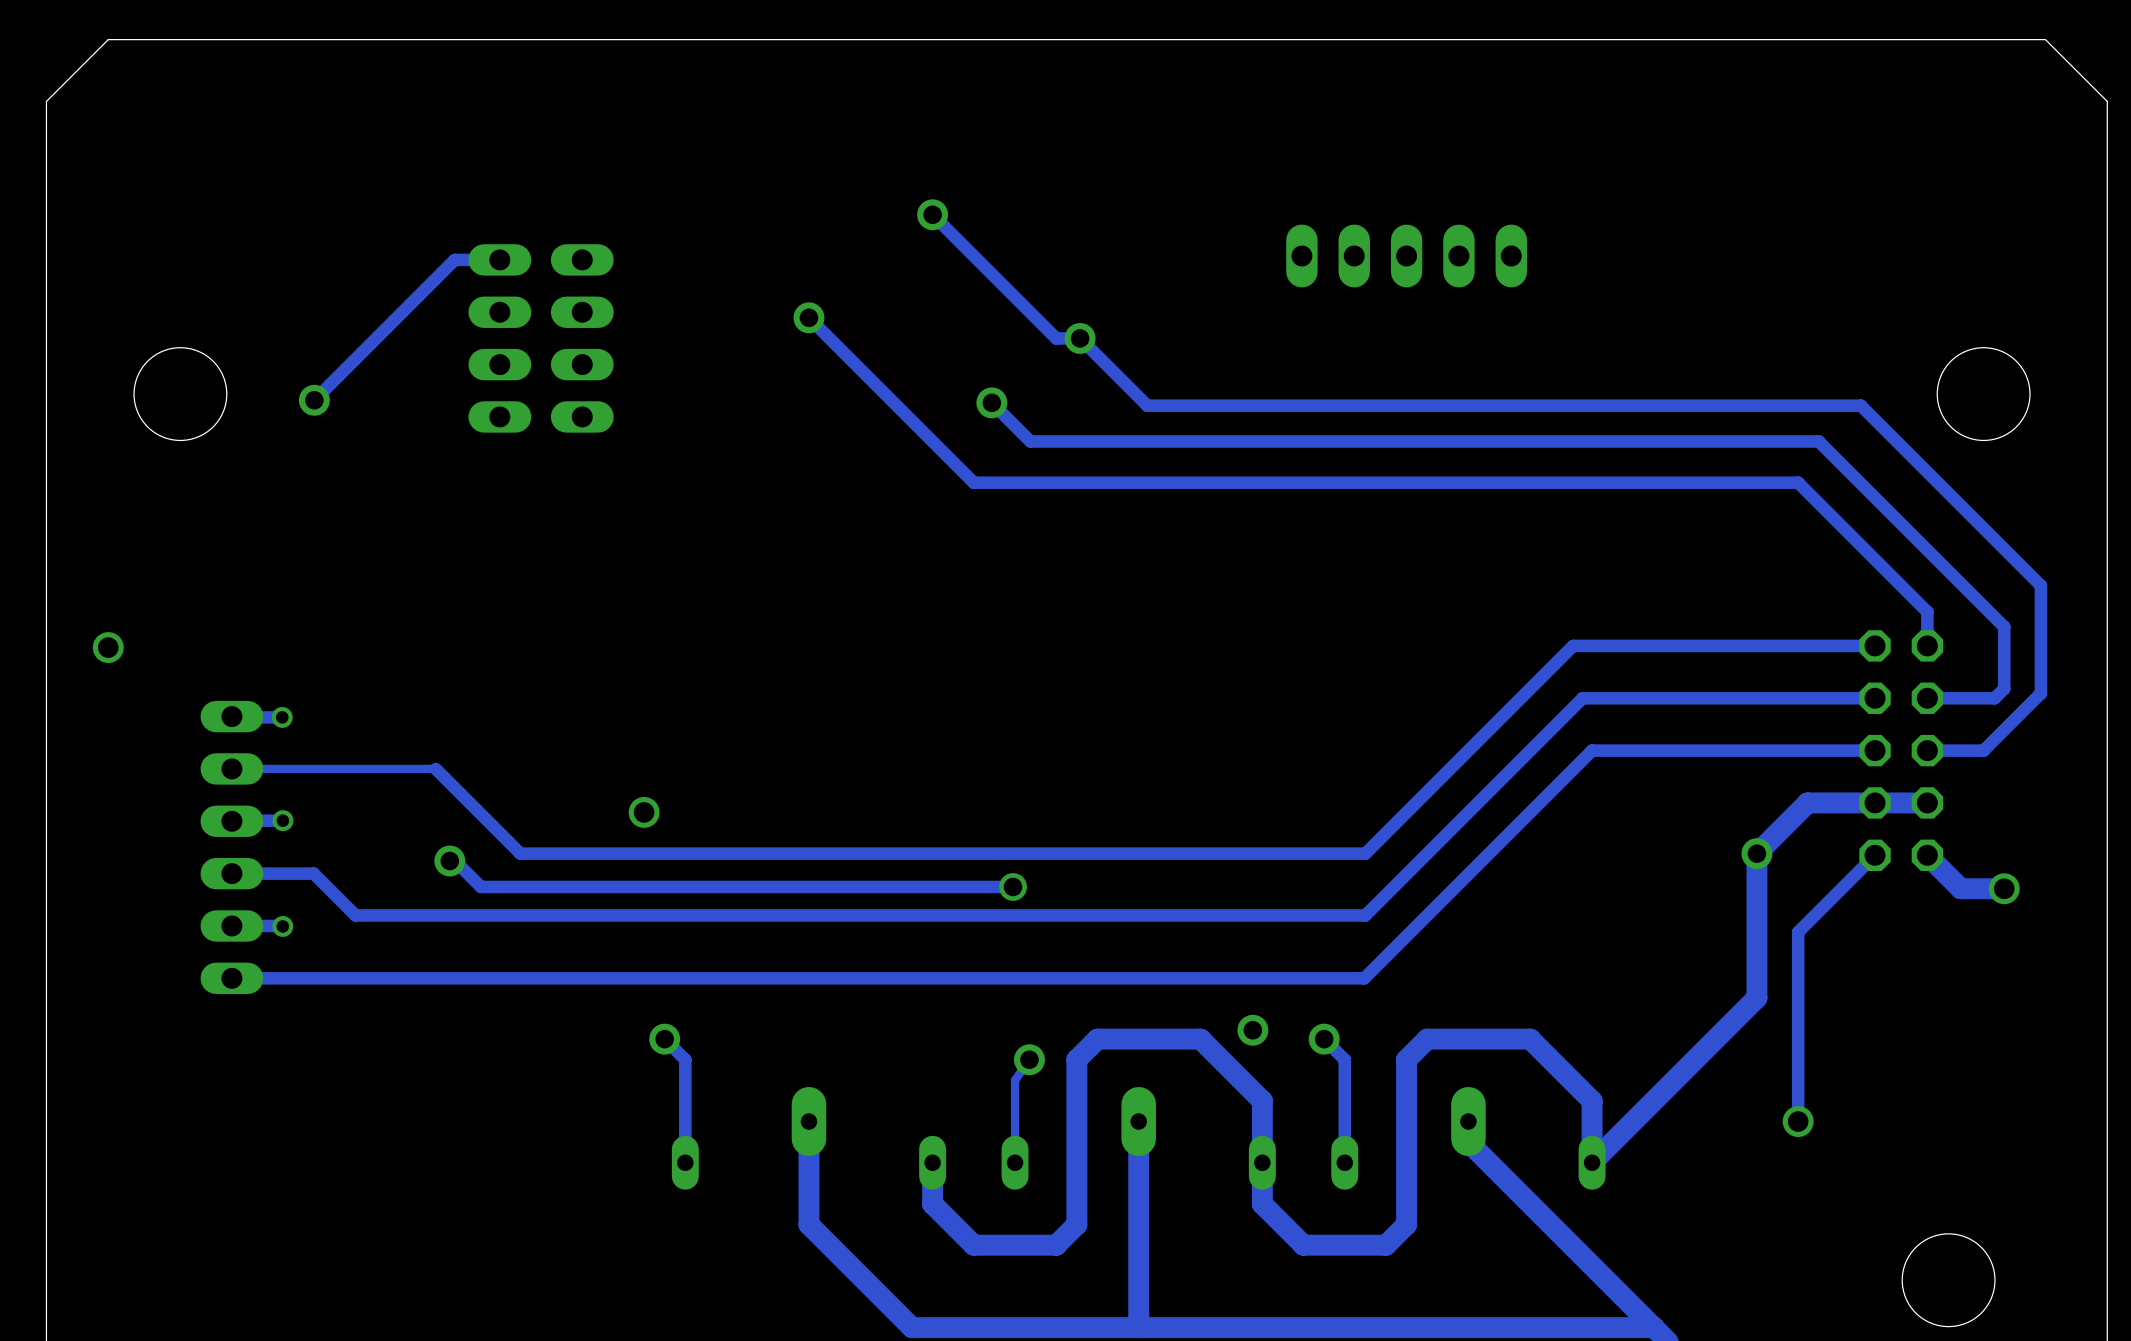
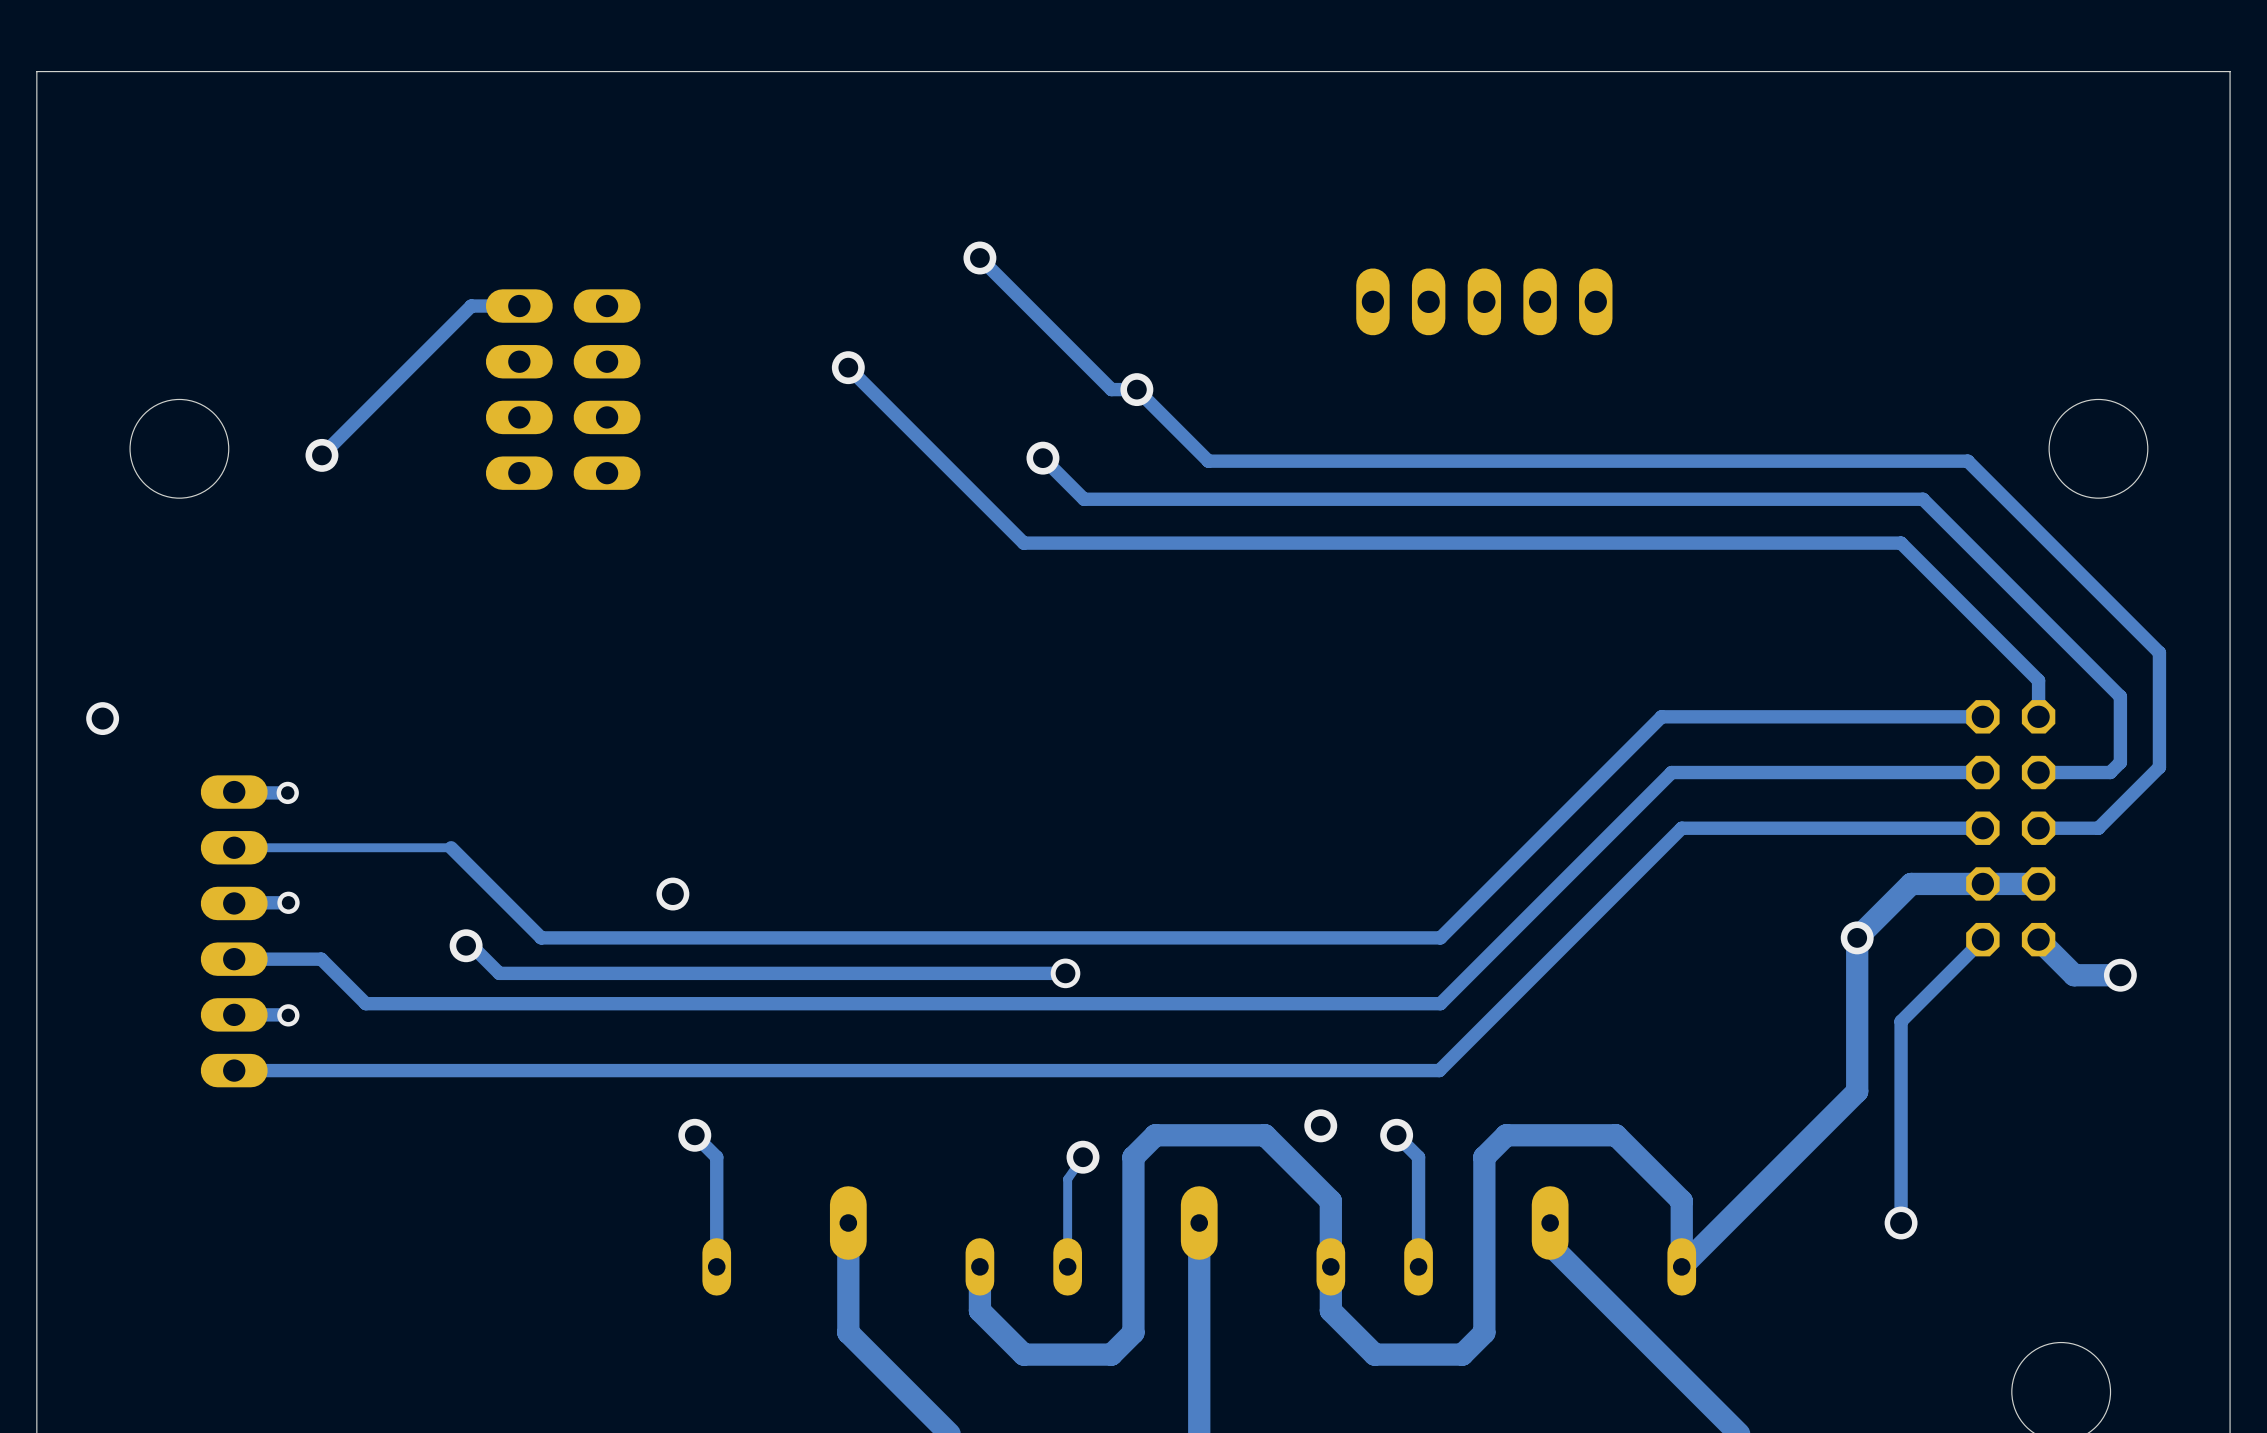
board edge: (108, 39) (46, 101) -> (102, 71) (36, 71) (36, 137)
board edge: (2045, 39) (2107, 101) -> (2164, 71) (2230, 71) (2230, 137)

